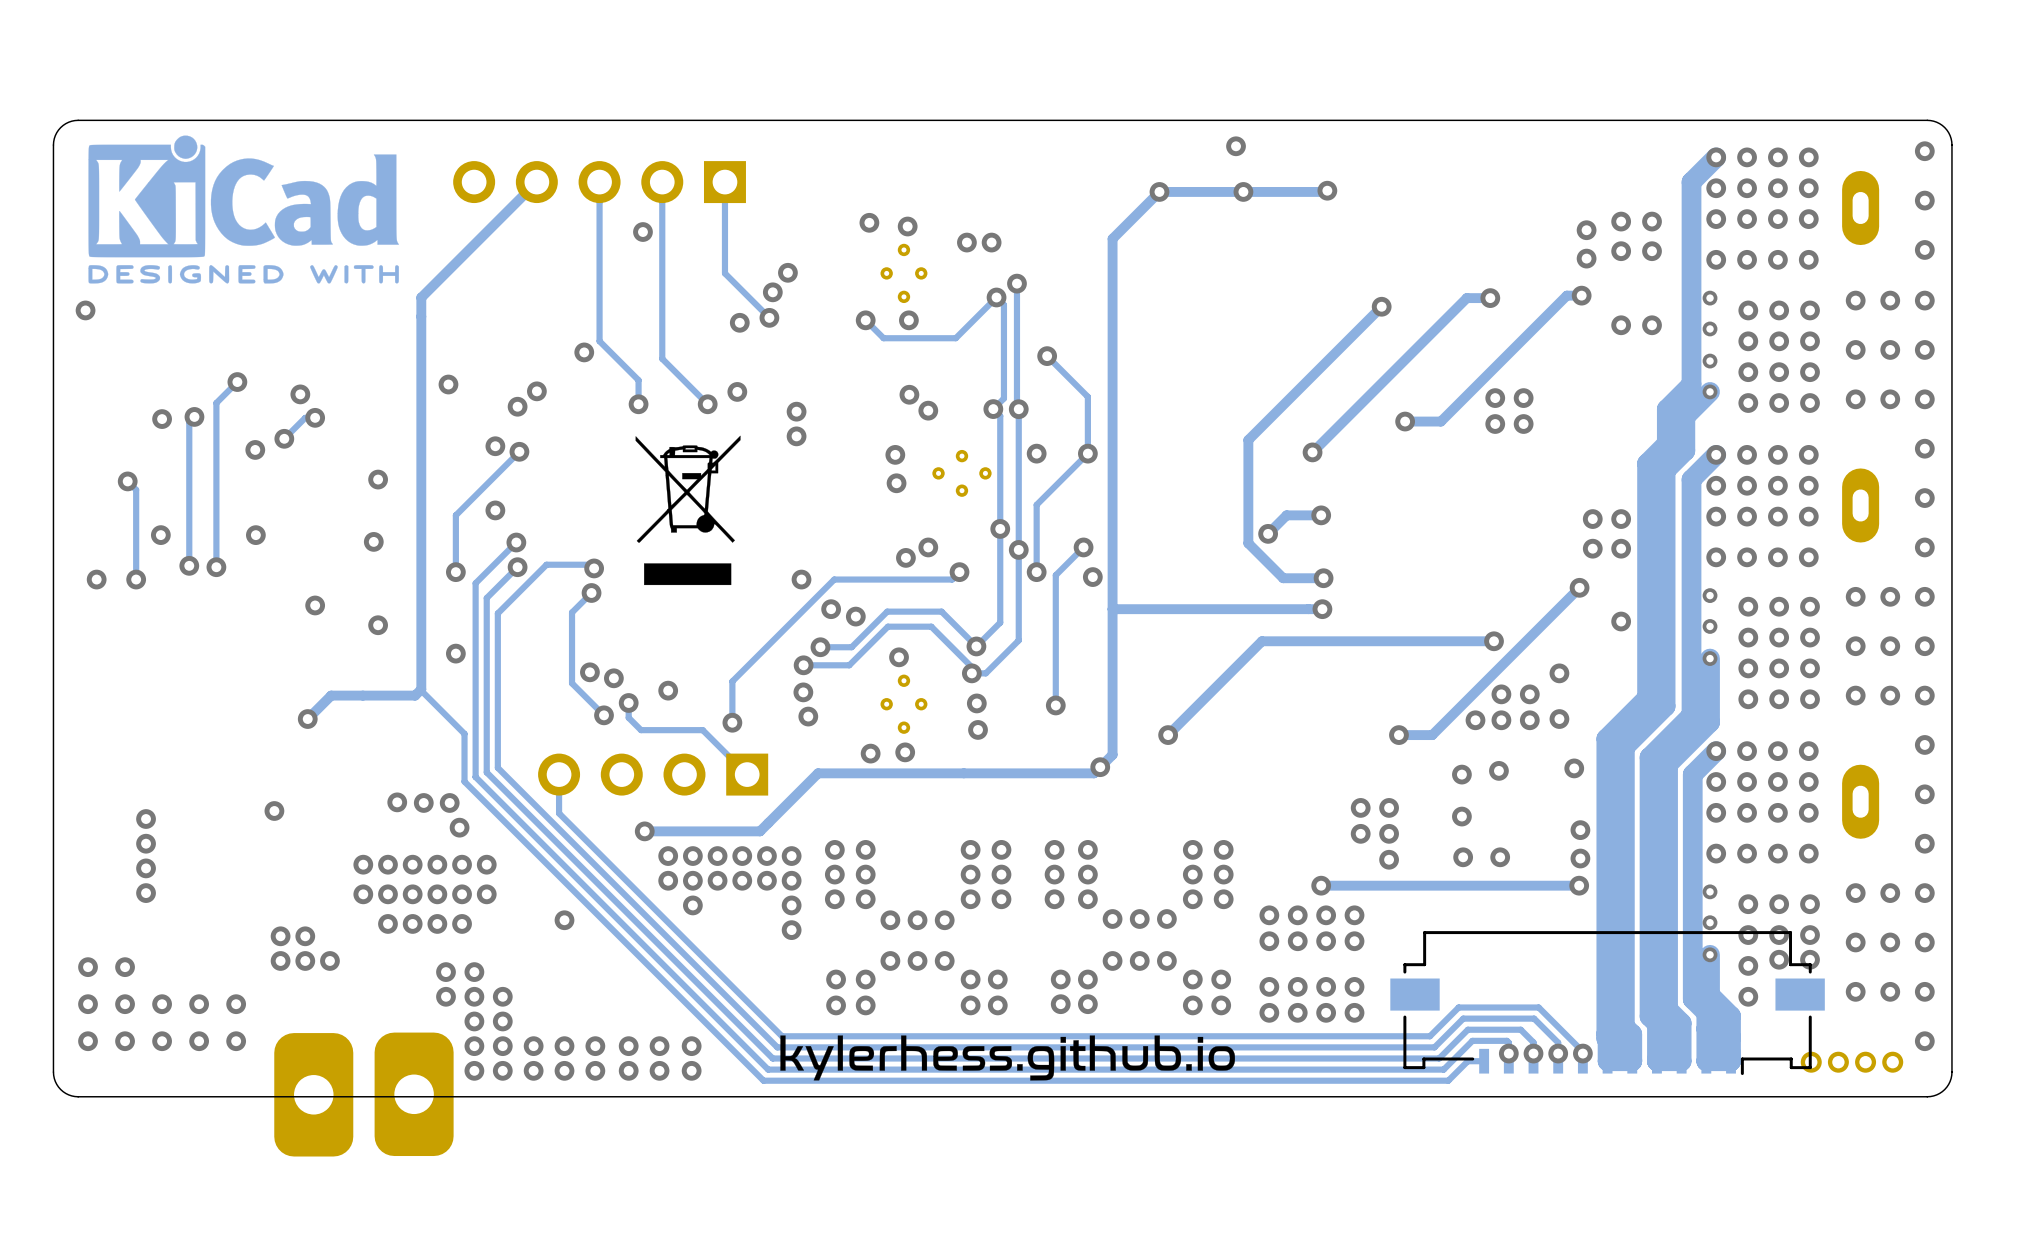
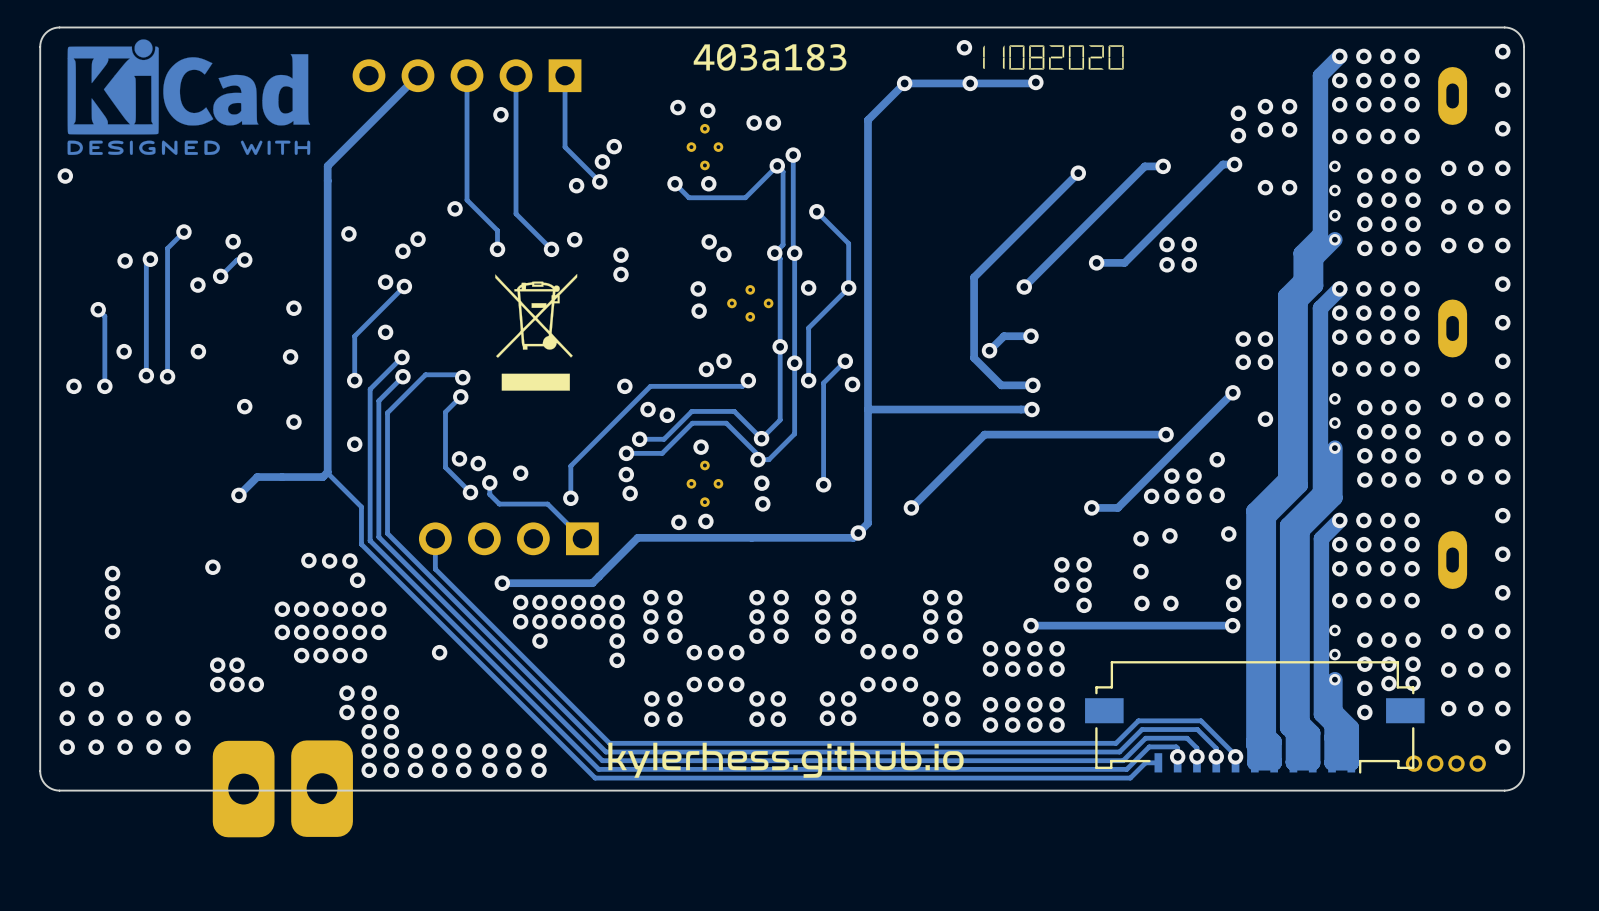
drawing: none -> [693, 43, 847, 71]
drawing: none -> [983, 45, 1124, 70]

